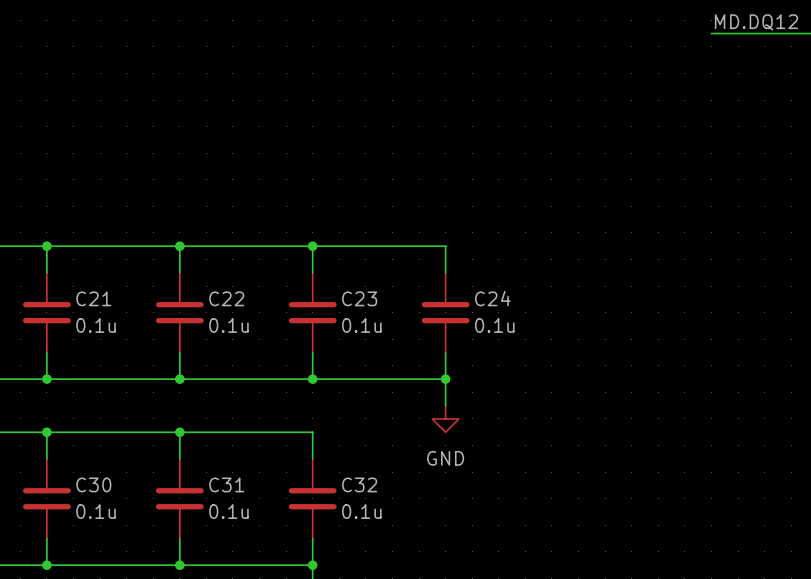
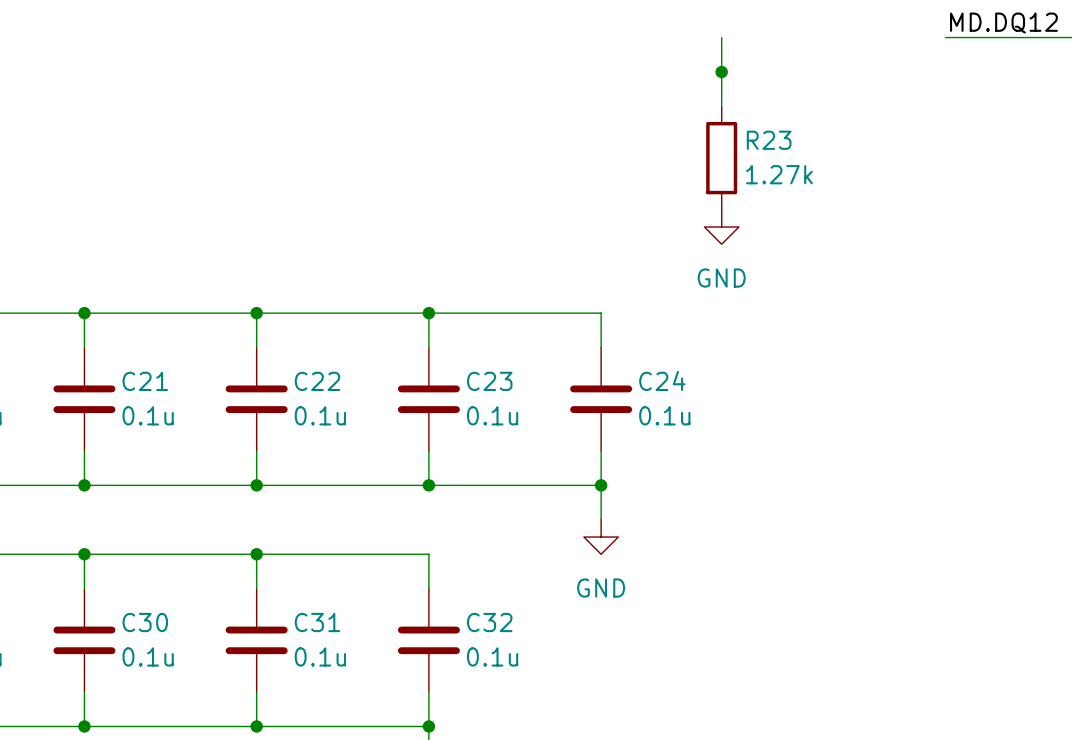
wire: none -> (721, 37) (721, 106)
junction: none -> (721, 72)
R23: none -> 1.27k (721, 158)
power symbol: none -> GND (721, 227)

